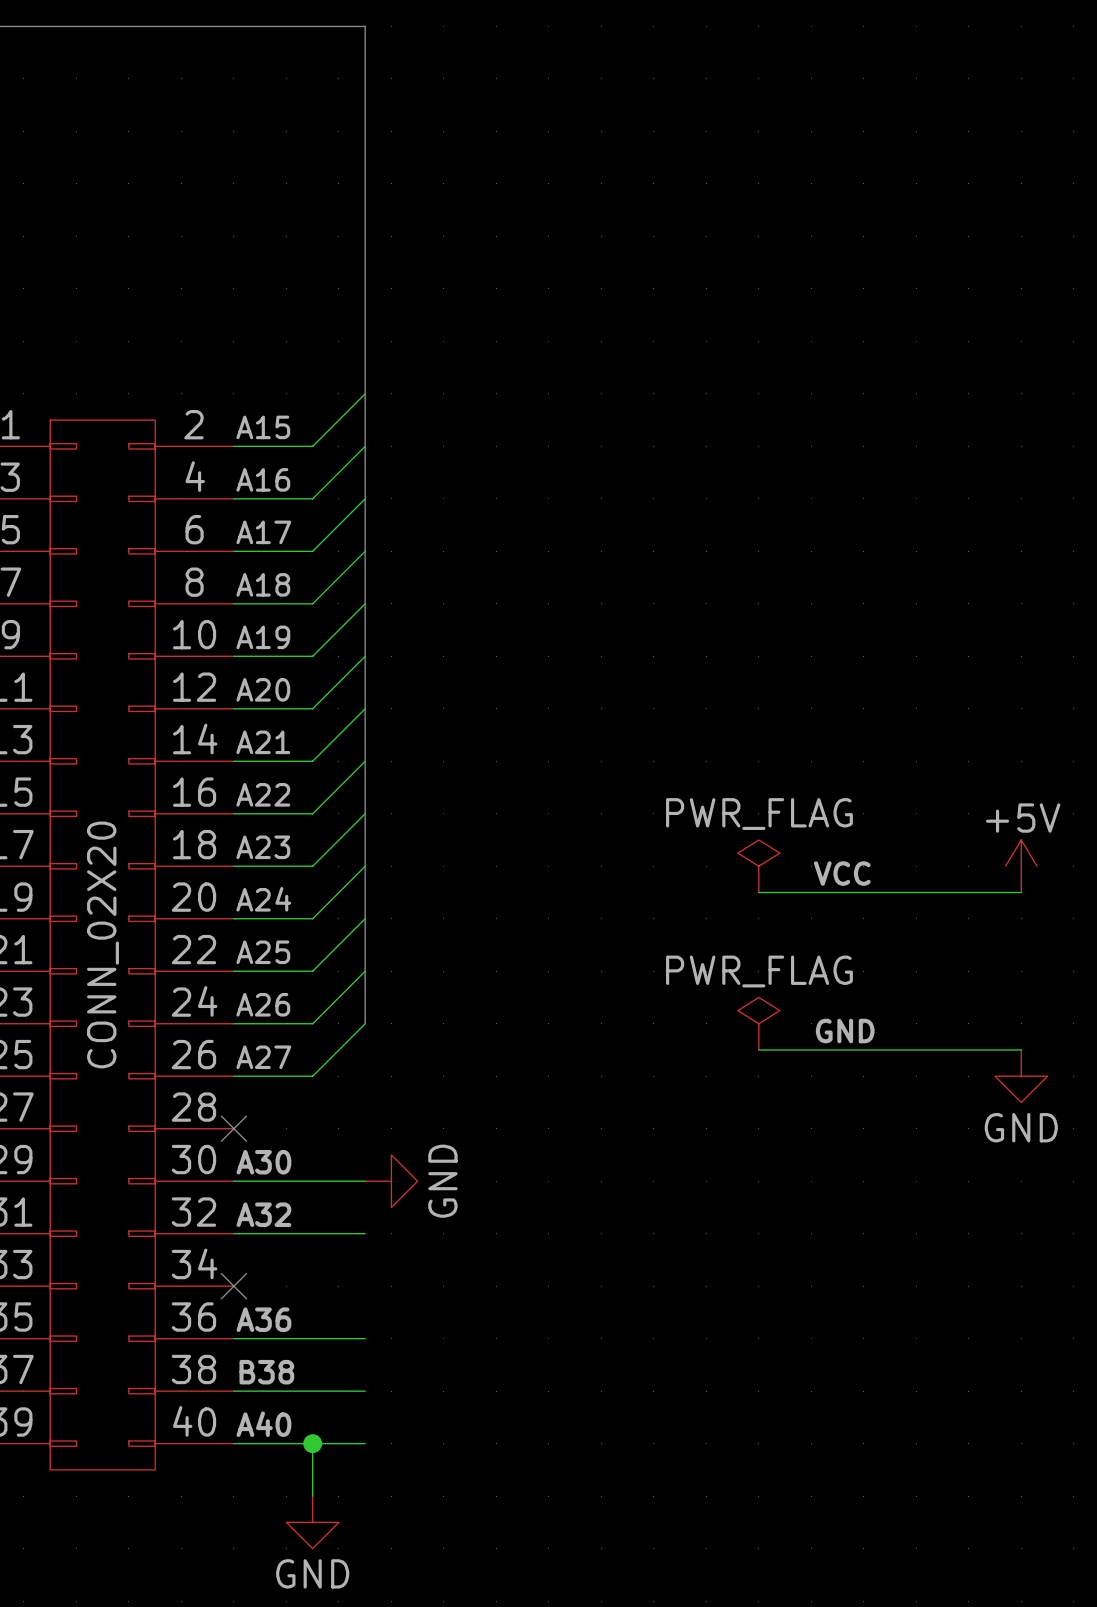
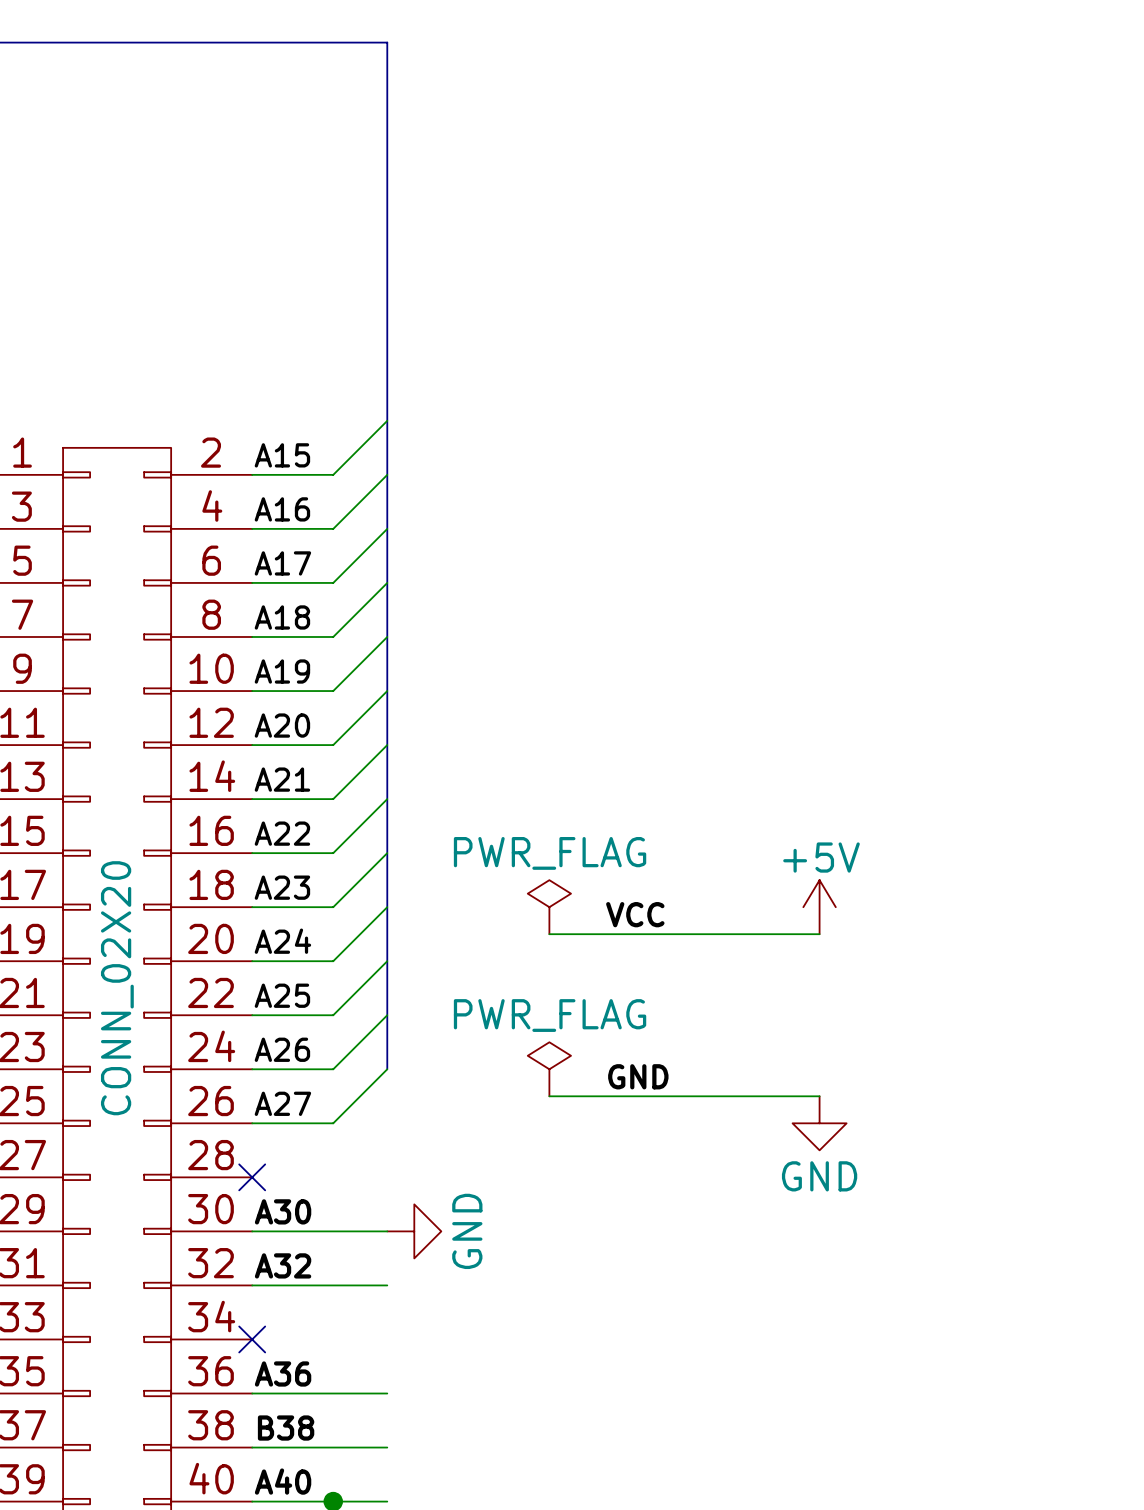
power symbol: none -> PWR_FLAG (549, 907)
power symbol: PWR_FLAG (758, 866) -> none
power symbol position: +5V (1021, 866) -> +5V (819, 907)
label position: VCC (842, 873) -> VCC (635, 914)
wire: (785, 892) (1021, 892) -> (549, 934) (792, 934)
power symbol: none -> PWR_FLAG (549, 1069)
power symbol: PWR_FLAG (758, 1023) -> none
label position: GND (845, 1031) -> GND (638, 1076)
wire: (785, 1049) (1021, 1049) -> (549, 1096) (792, 1096)
power symbol position: GND (1021, 1076) -> GND (819, 1123)

